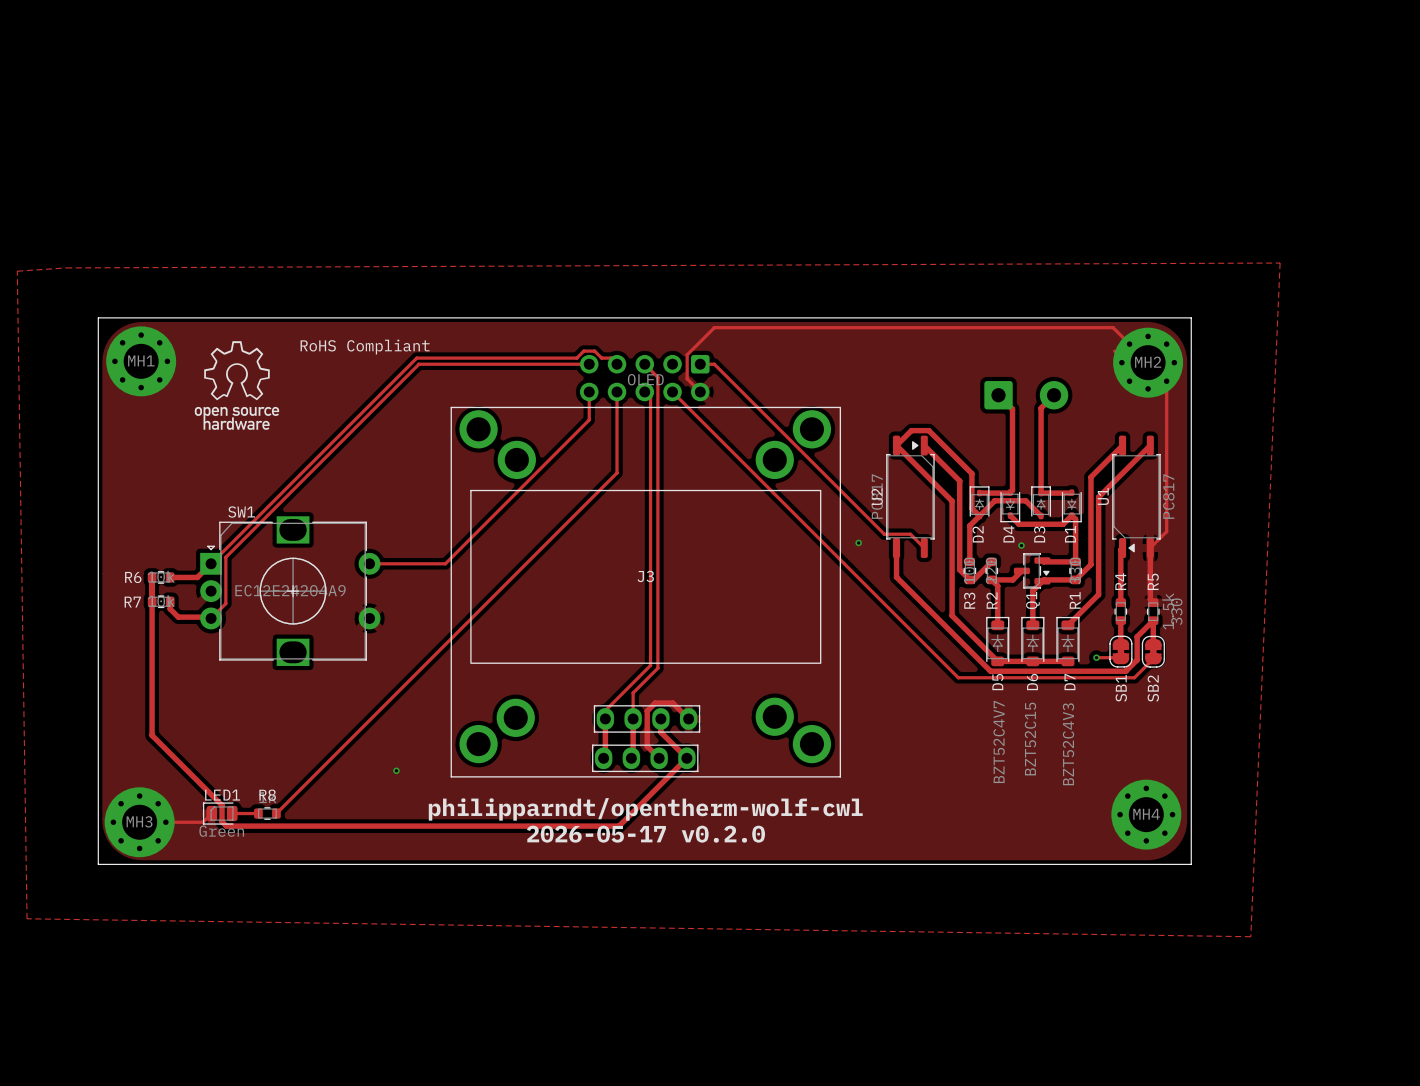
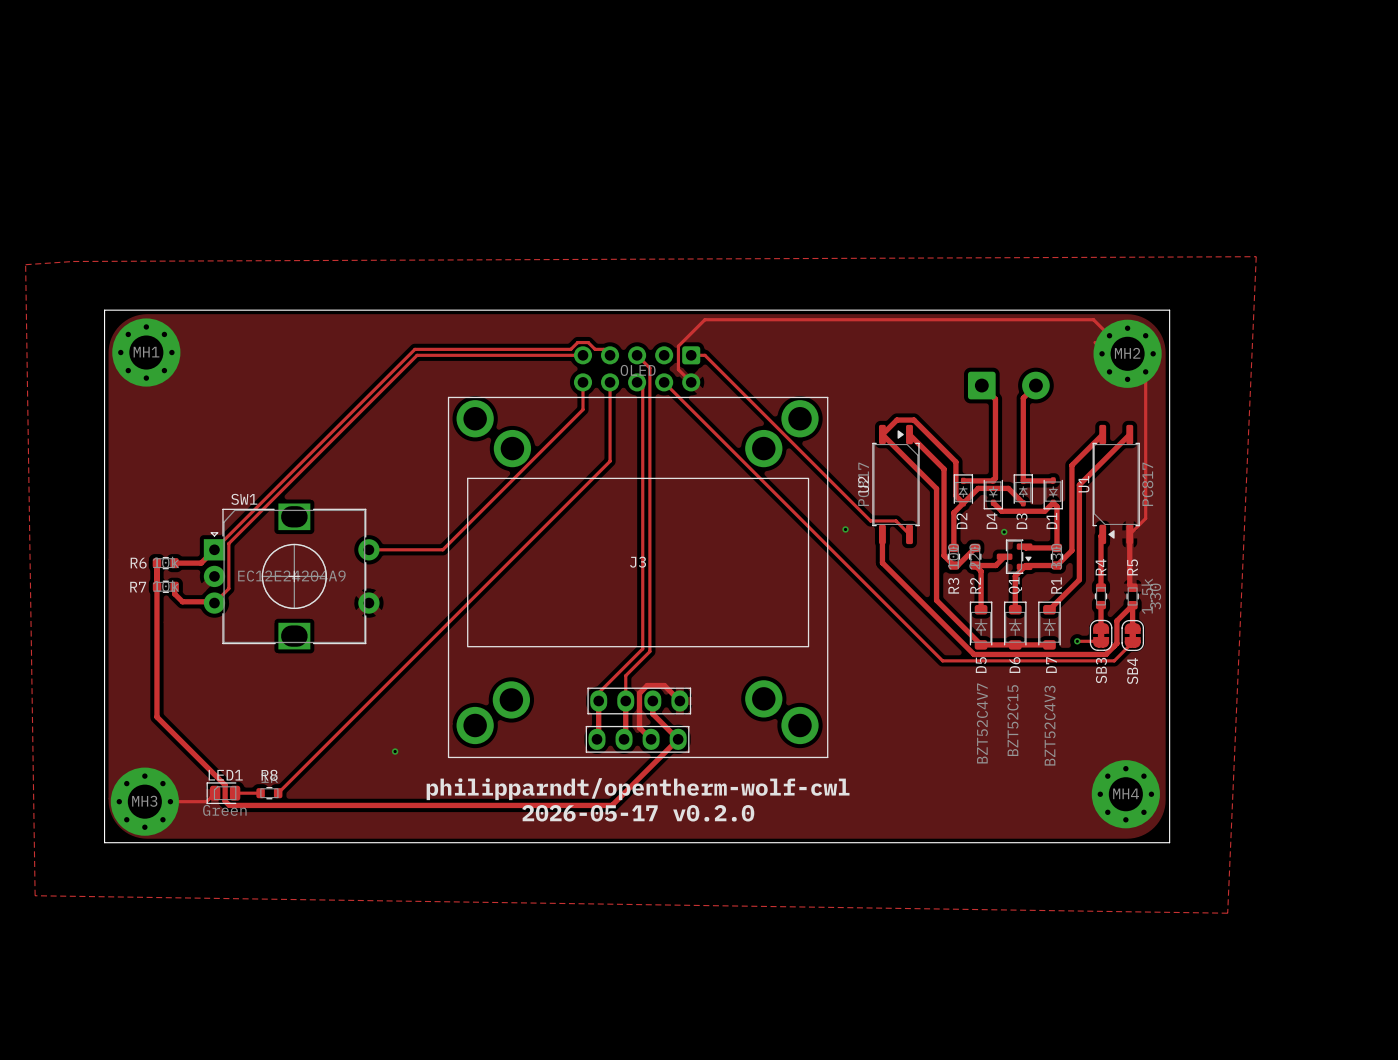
drawing: [194, 341, 280, 430] -> none
text: RoHS Compliant (365, 347) -> none
SB1 name: SB1 (1121, 688) -> SB3 (1101, 670)
SB2 name: SB2 (1153, 688) -> SB4 (1132, 671)

